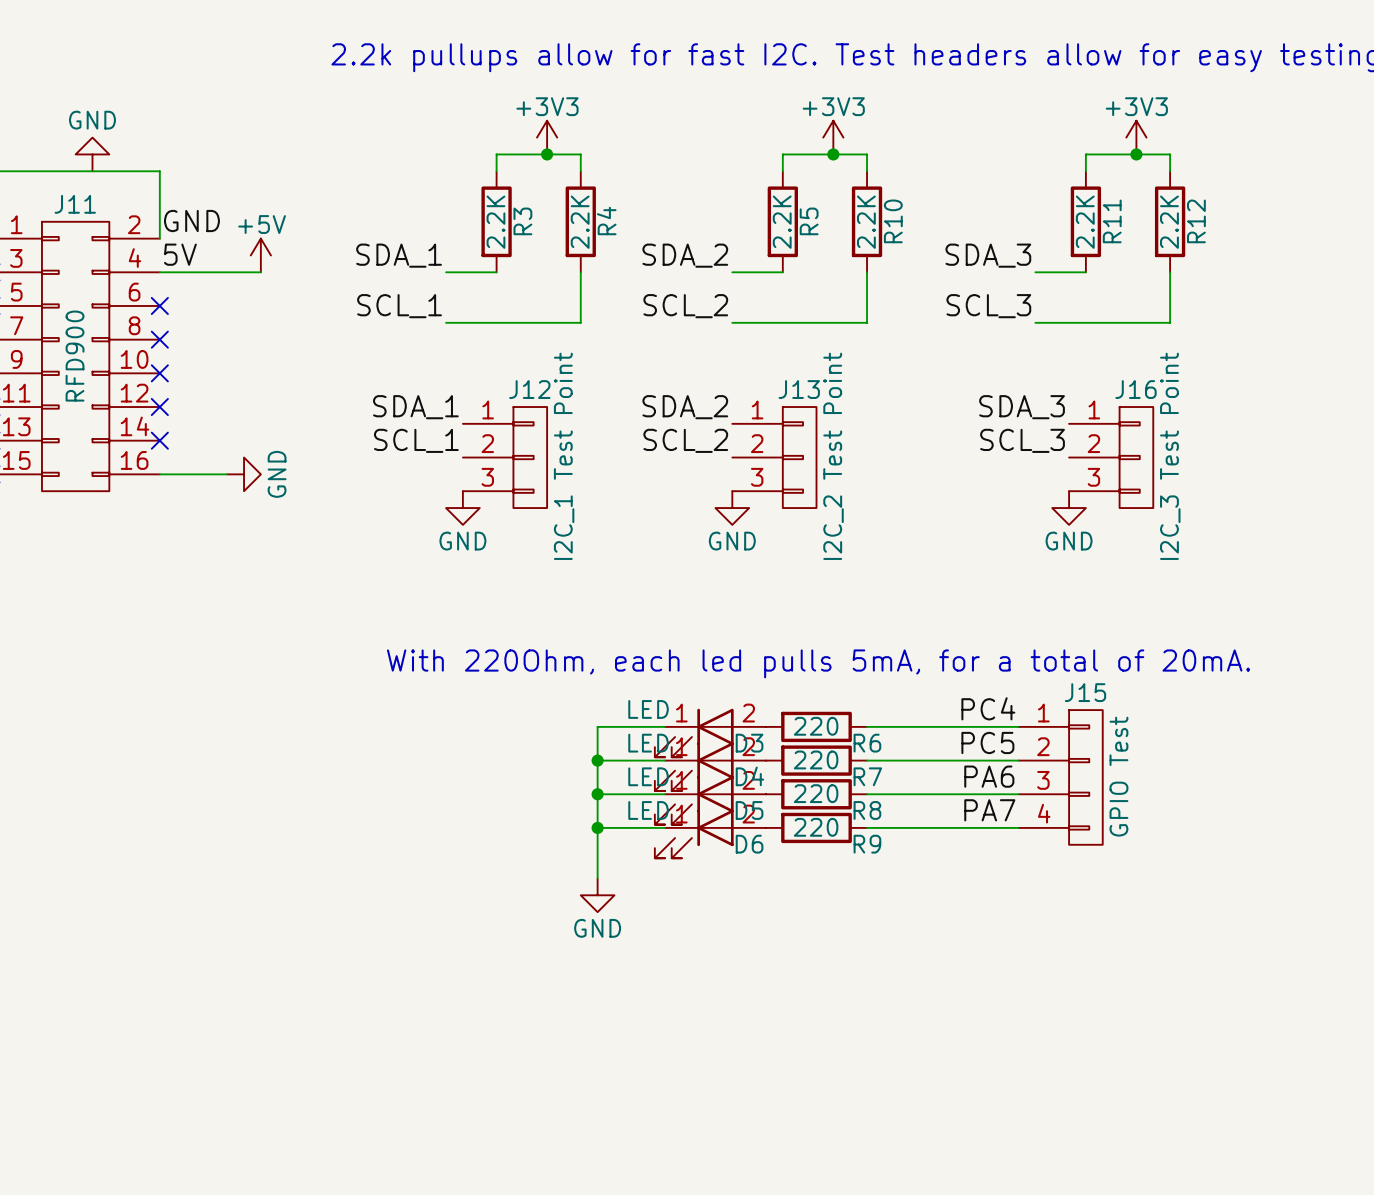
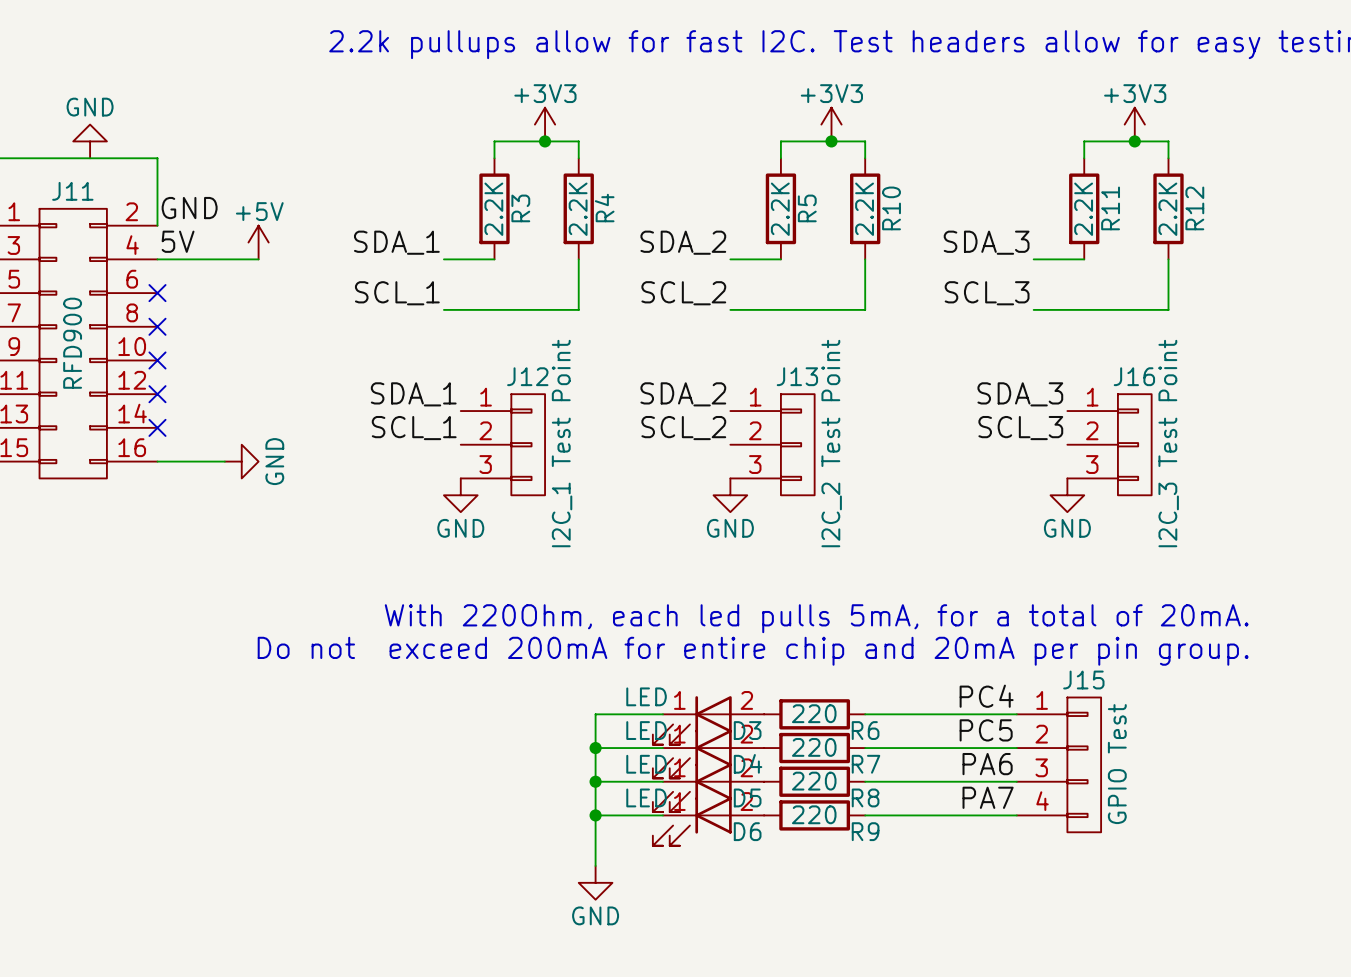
text: none -> With 220Ohm, each led pulls 5mA, for a total of 20mA. (816, 618)
text: With 220Ohm, each led pulls 5mA, for a total of 20mA. (818, 663) -> Do not exceed 200mA for entire chip and 20mA per pin group. (753, 651)

